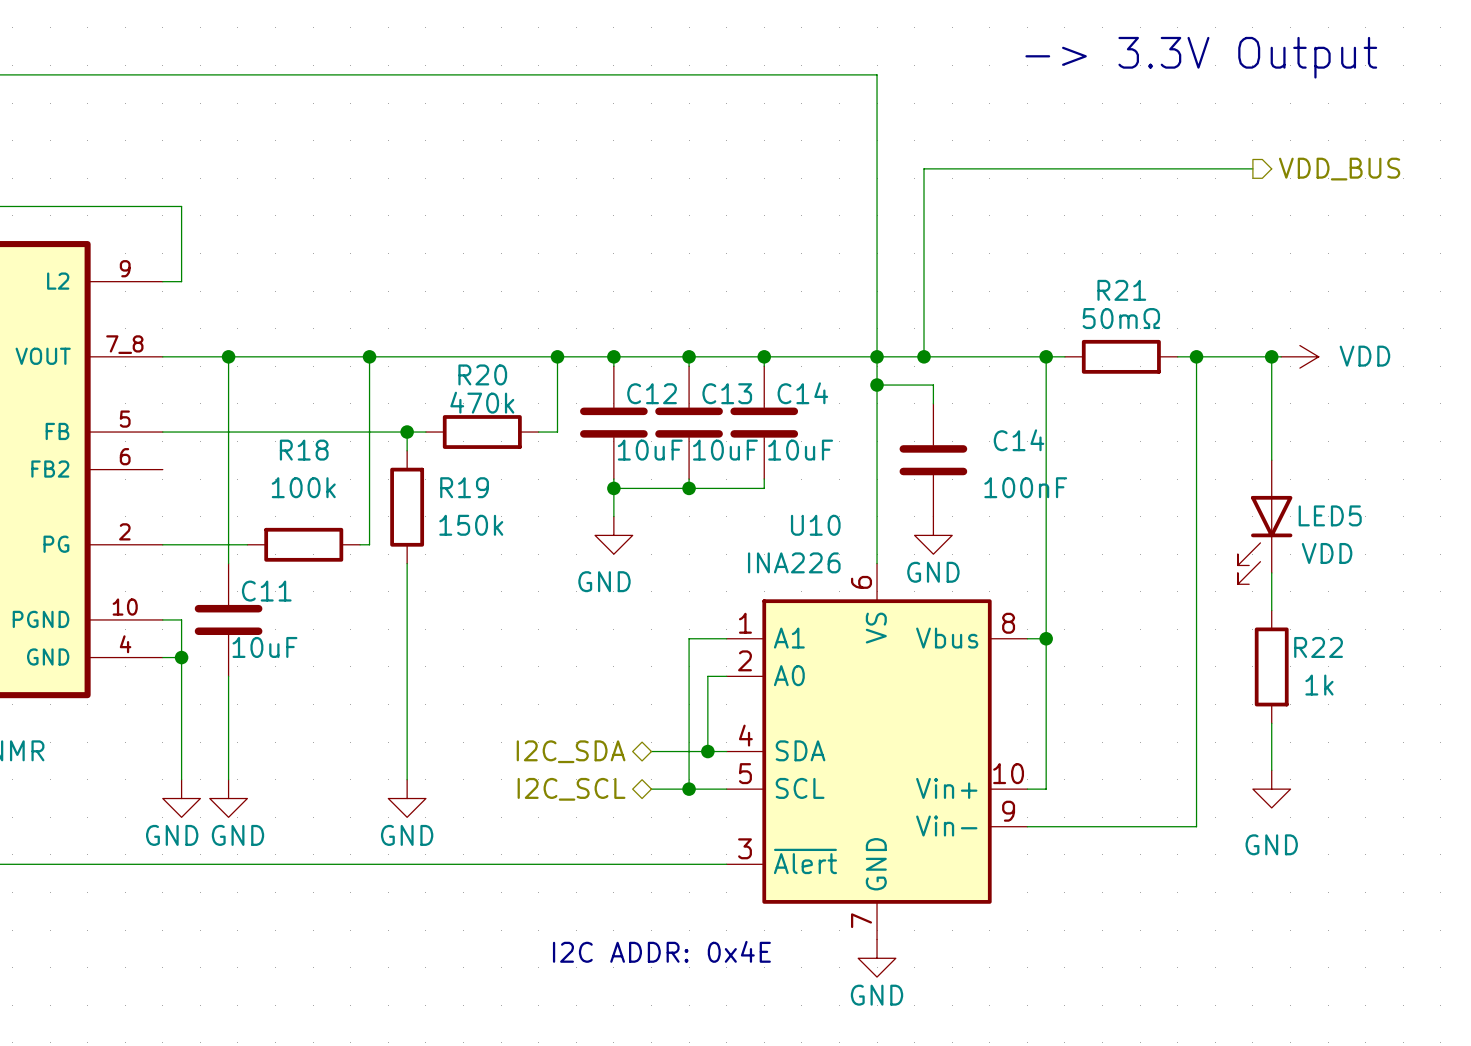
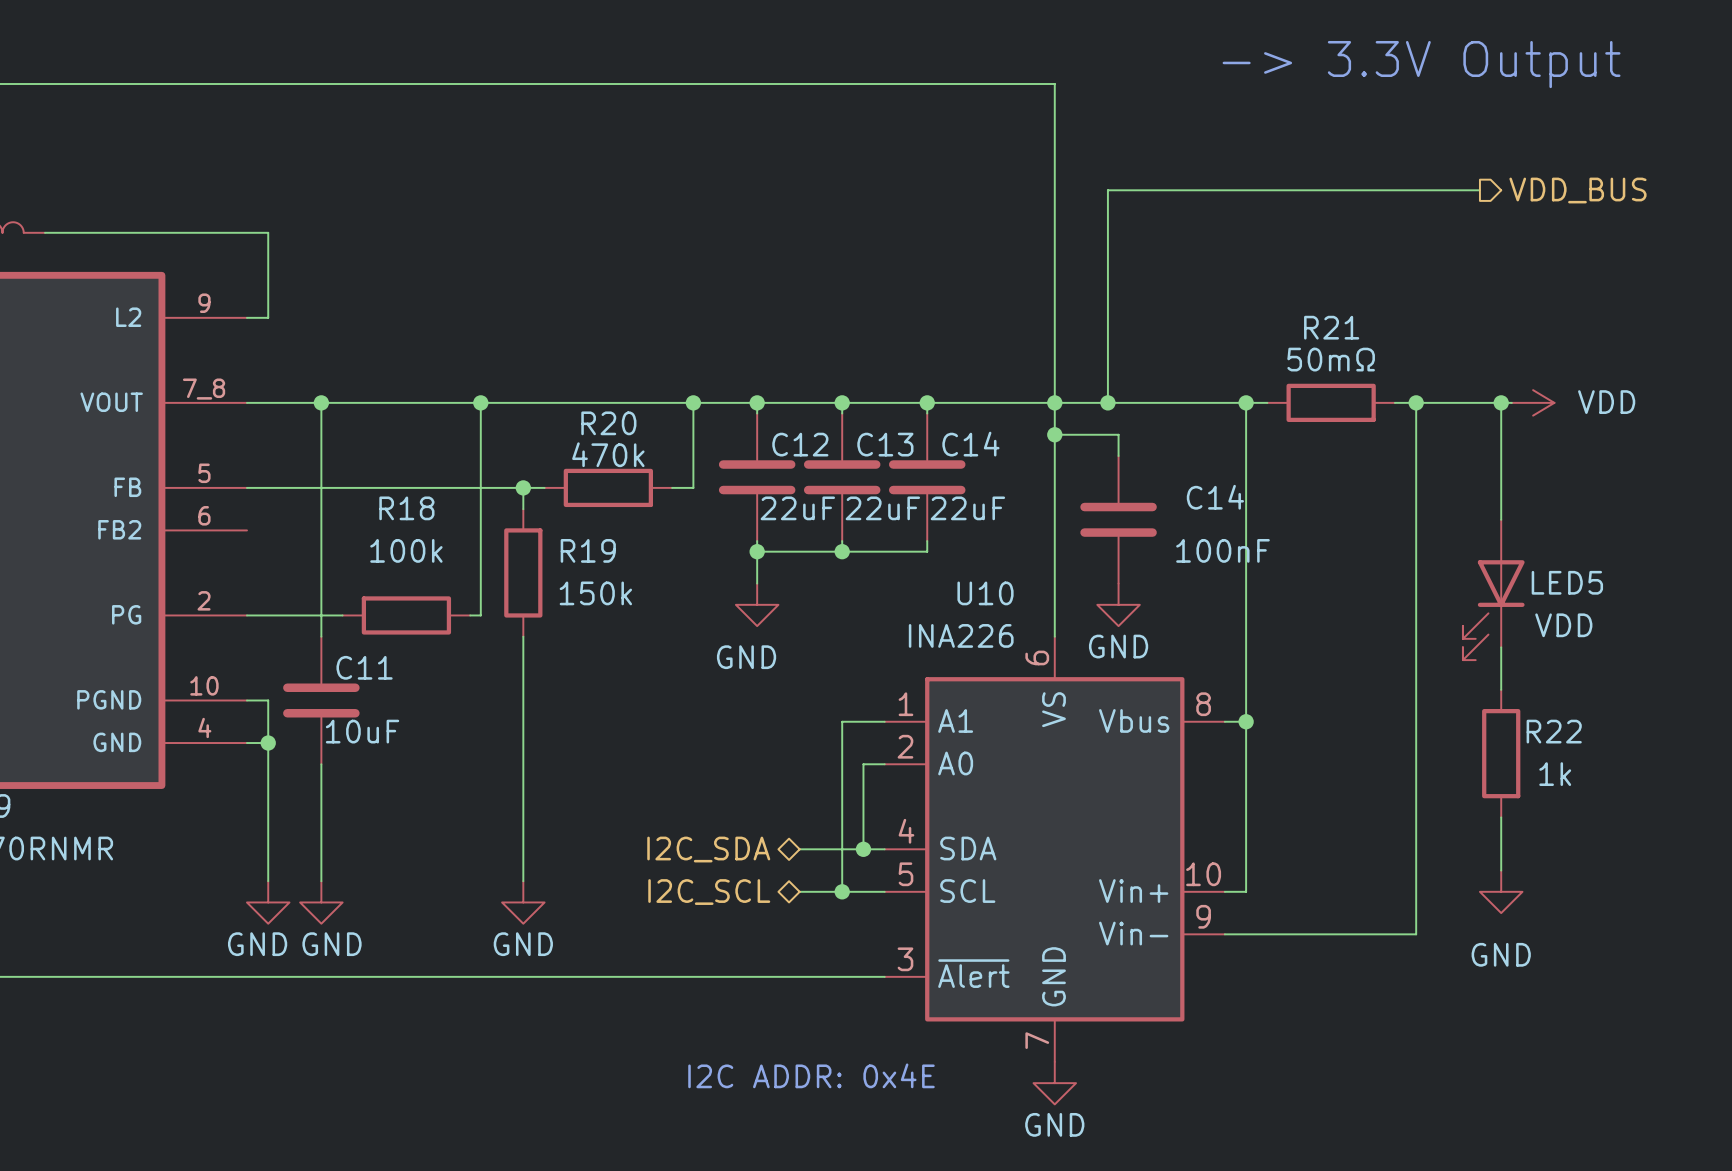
C12 value: 10uF (650, 450) -> 22uF (797, 508)
C13 value: 10uF (725, 450) -> 22uF (882, 508)
C14 value: 10uF (800, 450) -> 22uF (967, 508)

